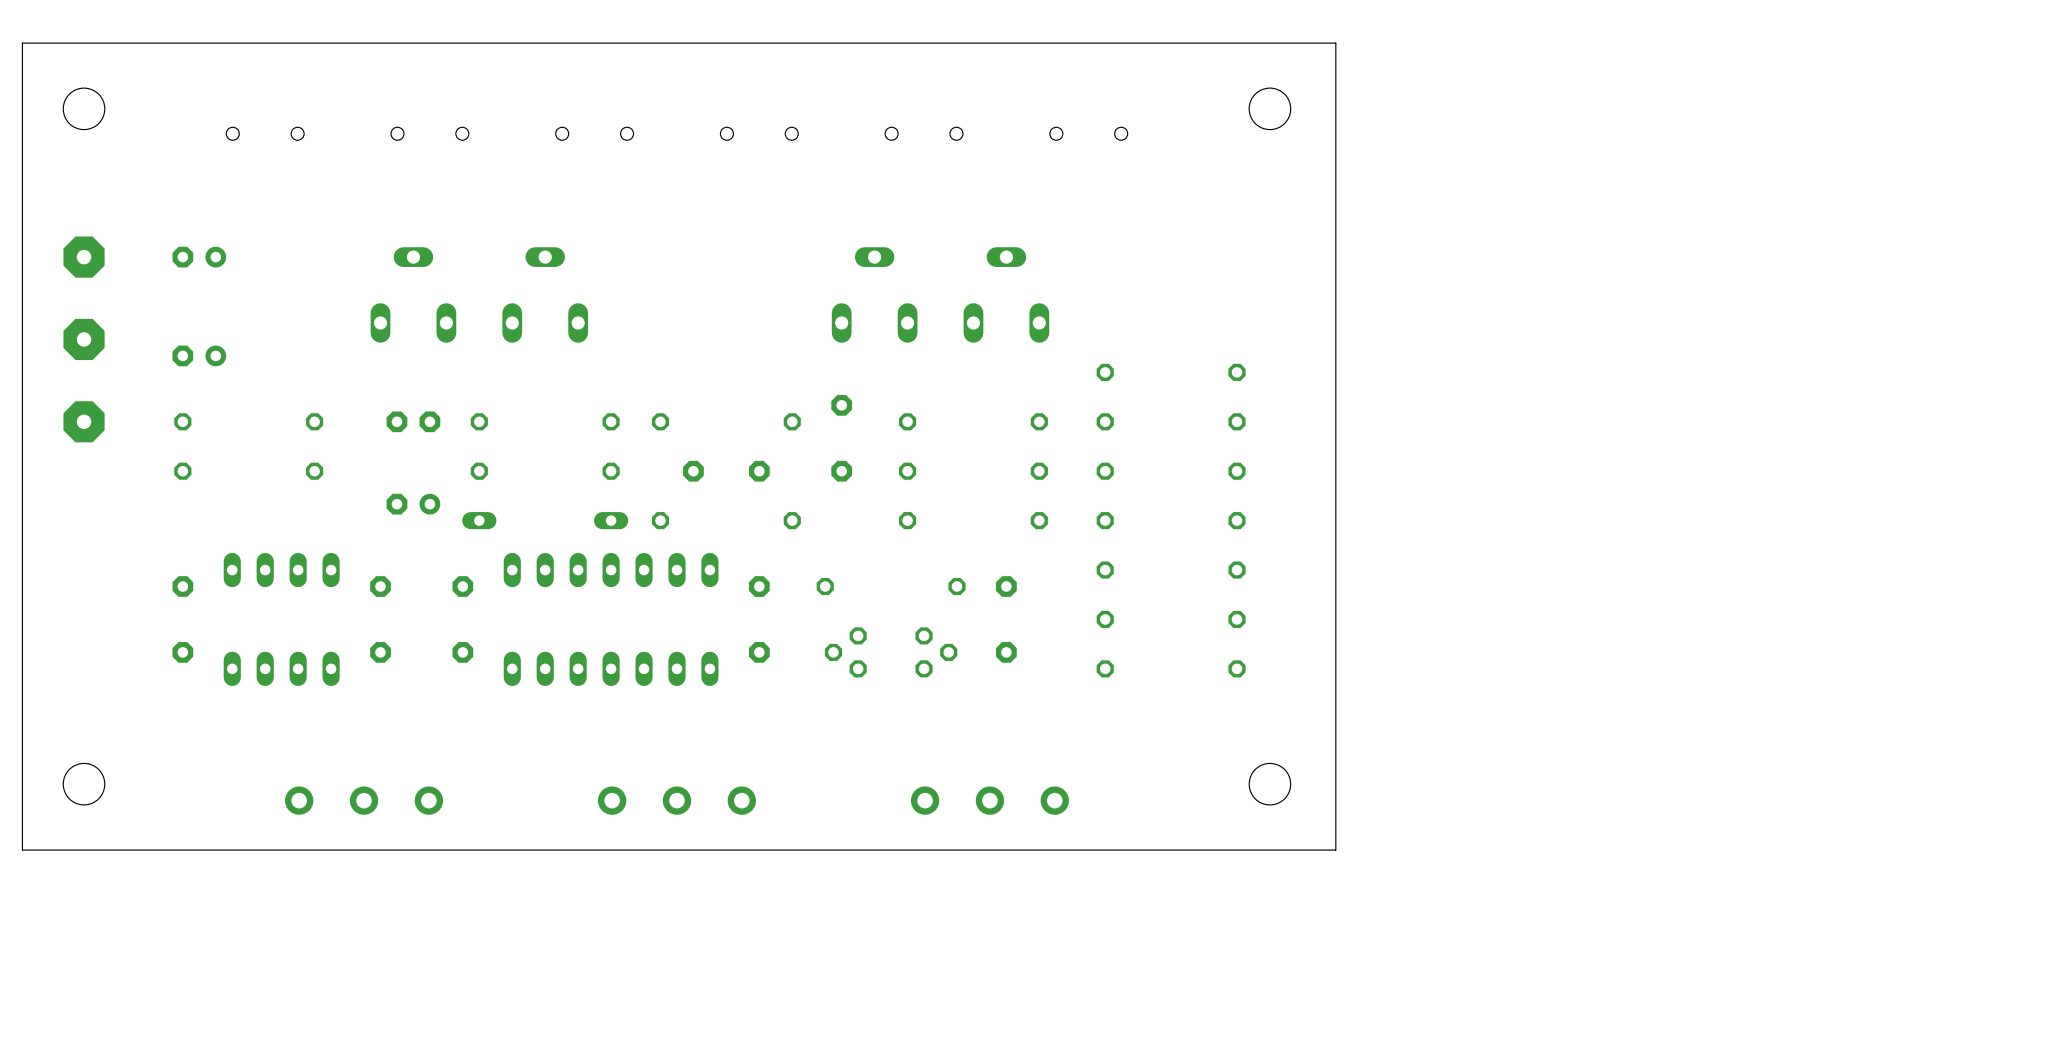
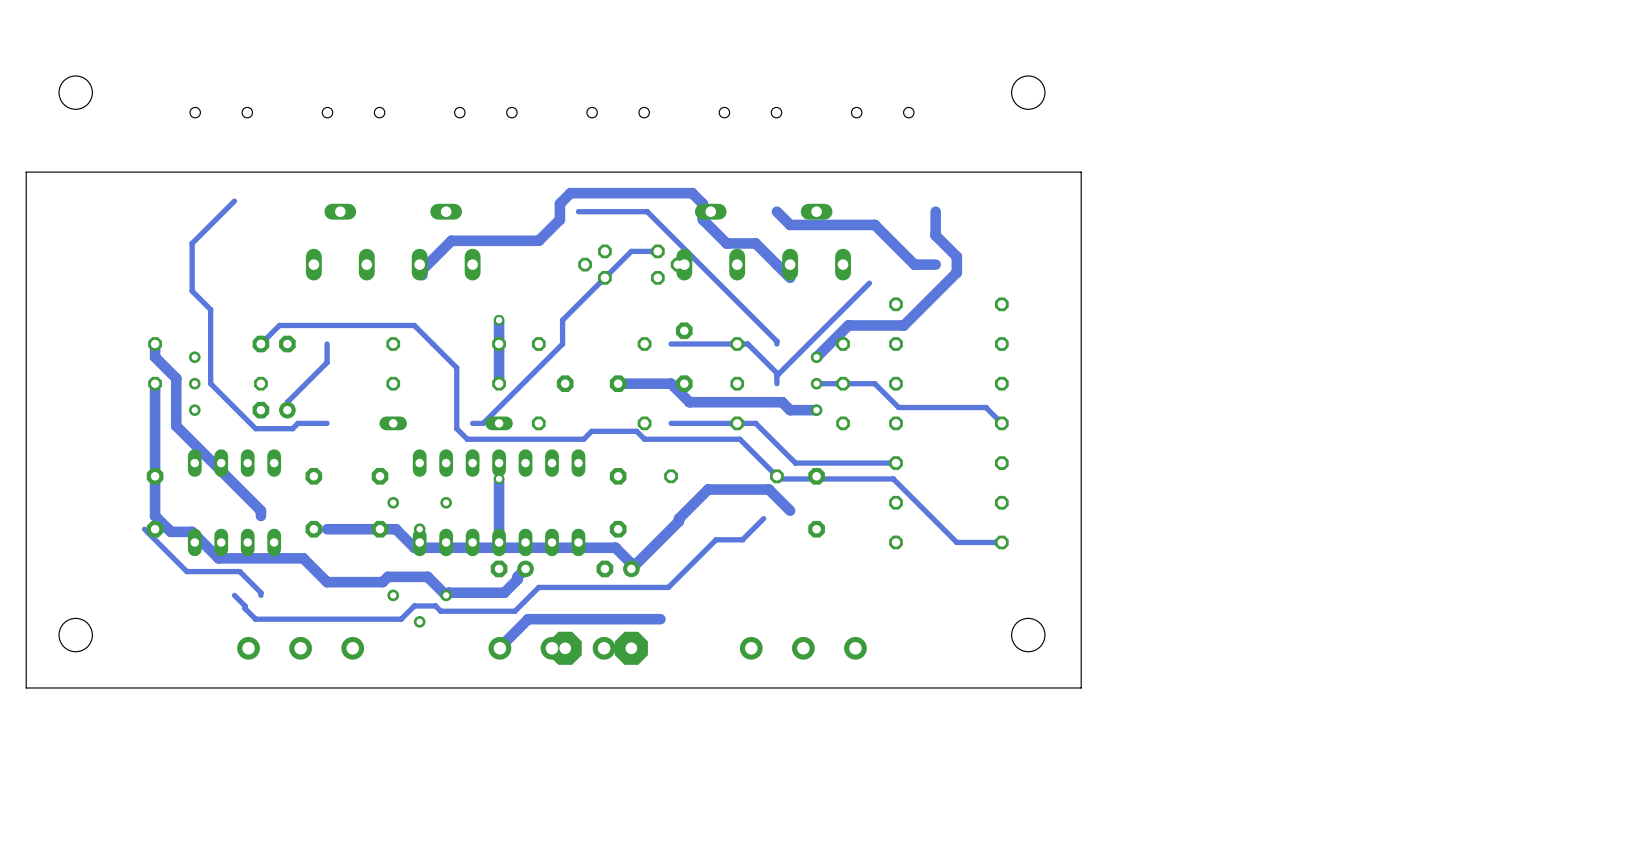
board edge: (1335, 207) (1335, 43) (22, 43) (22, 207) -> (1081, 172) (26, 172)
track: none -> (234, 201) (192, 243) (192, 291) (210, 309) (210, 383) (255, 428) (292, 428) (297, 423) (327, 423)
part: (84, 257) -> none
part: (199, 257) -> none
track: none -> (578, 211) (647, 211) (776, 341) (776, 344)
track: none -> (776, 211) (790, 224) (874, 224) (914, 264) (935, 264)
track: none -> (935, 211) (935, 235) (956, 256) (956, 272) (903, 325) (848, 325) (816, 357)
track: none -> (657, 251) (631, 251) (562, 320) (562, 344) (483, 423) (472, 423)
part: none -> (594, 264)
part: none -> (667, 264)
track: none -> (422, 275) (422, 269) (451, 240) (538, 240) (559, 219) (559, 203) (570, 193) (692, 193) (702, 203) (702, 219) (726, 243) (755, 243) (790, 277)
part: (84, 339) -> none
track: none -> (869, 283) (776, 375) (776, 383)
part: (199, 355) -> none
track: none -> (499, 320) (499, 383)
via: none -> (499, 320)
part: (84, 421) -> none
track: none -> (155, 344) (155, 357) (176, 378) (176, 426) (260, 510) (260, 516)
track: none -> (260, 344) (279, 325) (414, 325) (456, 367) (456, 428) (467, 439) (583, 439) (591, 431) (636, 431) (644, 439) (739, 439) (779, 478) (893, 478) (956, 542) (1001, 542)
track: none -> (327, 344) (327, 362) (287, 402) (287, 410)
part position: (413, 421) -> (274, 344)
track: none -> (671, 344) (747, 344) (778, 374)
track: none -> (155, 383) (155, 516) (170, 531) (192, 531) (218, 558) (303, 558) (327, 582) (382, 582) (387, 576) (427, 576) (446, 595) (448, 592) (504, 592) (525, 568)
part: none -> (194, 383)
track: none -> (618, 383) (671, 383) (689, 402) (782, 402) (790, 410) (816, 410)
track: none -> (816, 383) (874, 383) (898, 407) (985, 407) (1001, 423)
part: none -> (816, 383)
part position: (413, 504) -> (274, 410)
track: none -> (671, 423) (755, 423) (795, 463) (895, 463)
track: none -> (499, 478) (499, 547)
via: none -> (499, 478)
track: none -> (790, 510) (768, 489) (708, 489) (631, 568) (631, 563) (615, 547) (414, 547) (395, 529) (327, 529)
part: none -> (419, 516)
track: none -> (763, 518) (742, 539) (716, 539) (668, 587) (538, 587) (514, 611) (440, 611) (435, 605) (414, 605) (401, 619) (255, 619) (234, 595)
track: none -> (144, 529) (186, 571) (239, 571) (260, 592) (260, 595)
part: (845, 652) -> none
part: (936, 652) -> none
part: none -> (512, 568)
part: none -> (618, 568)
part: none -> (419, 608)
track: none -> (660, 619) (528, 619) (499, 648)
part: none -> (565, 648)
part: none -> (631, 648)

